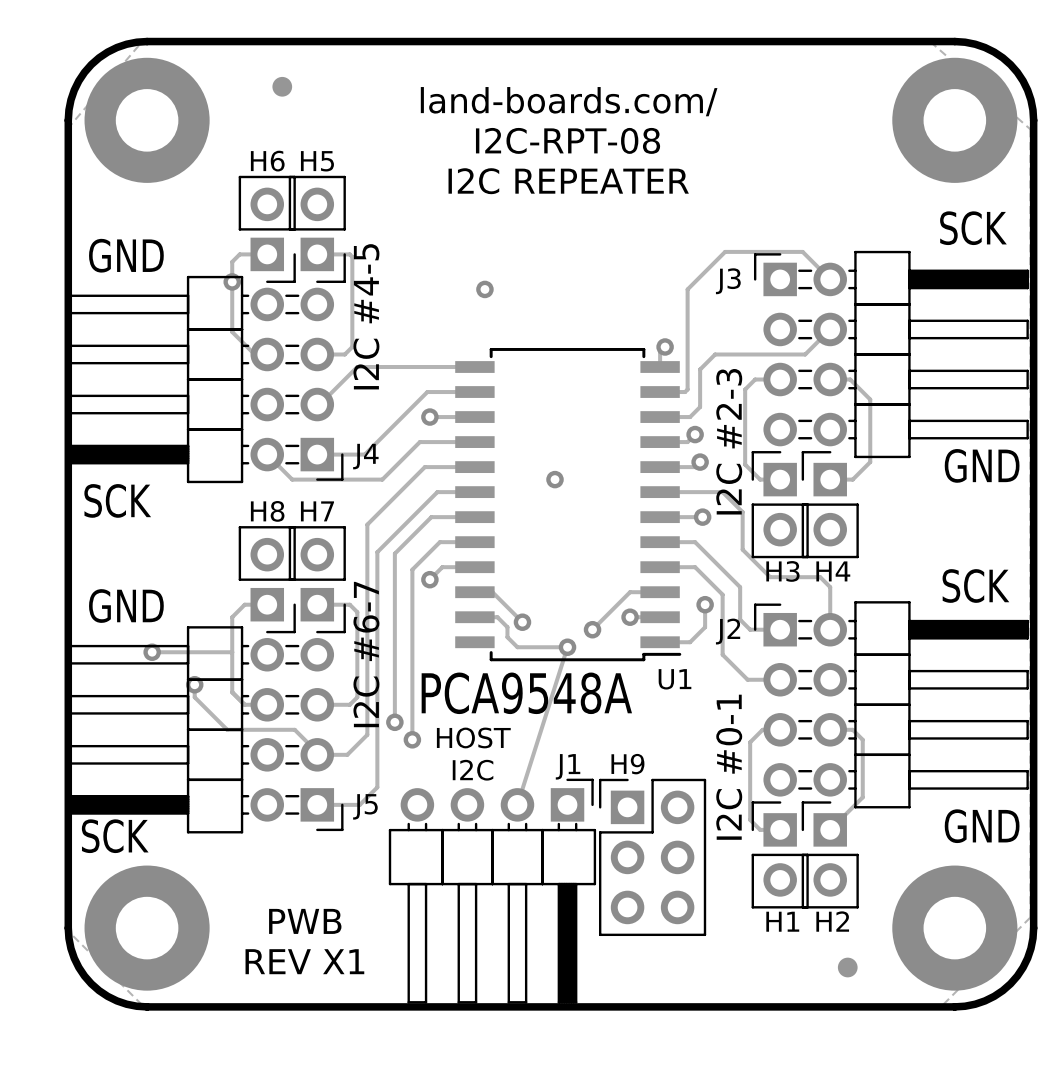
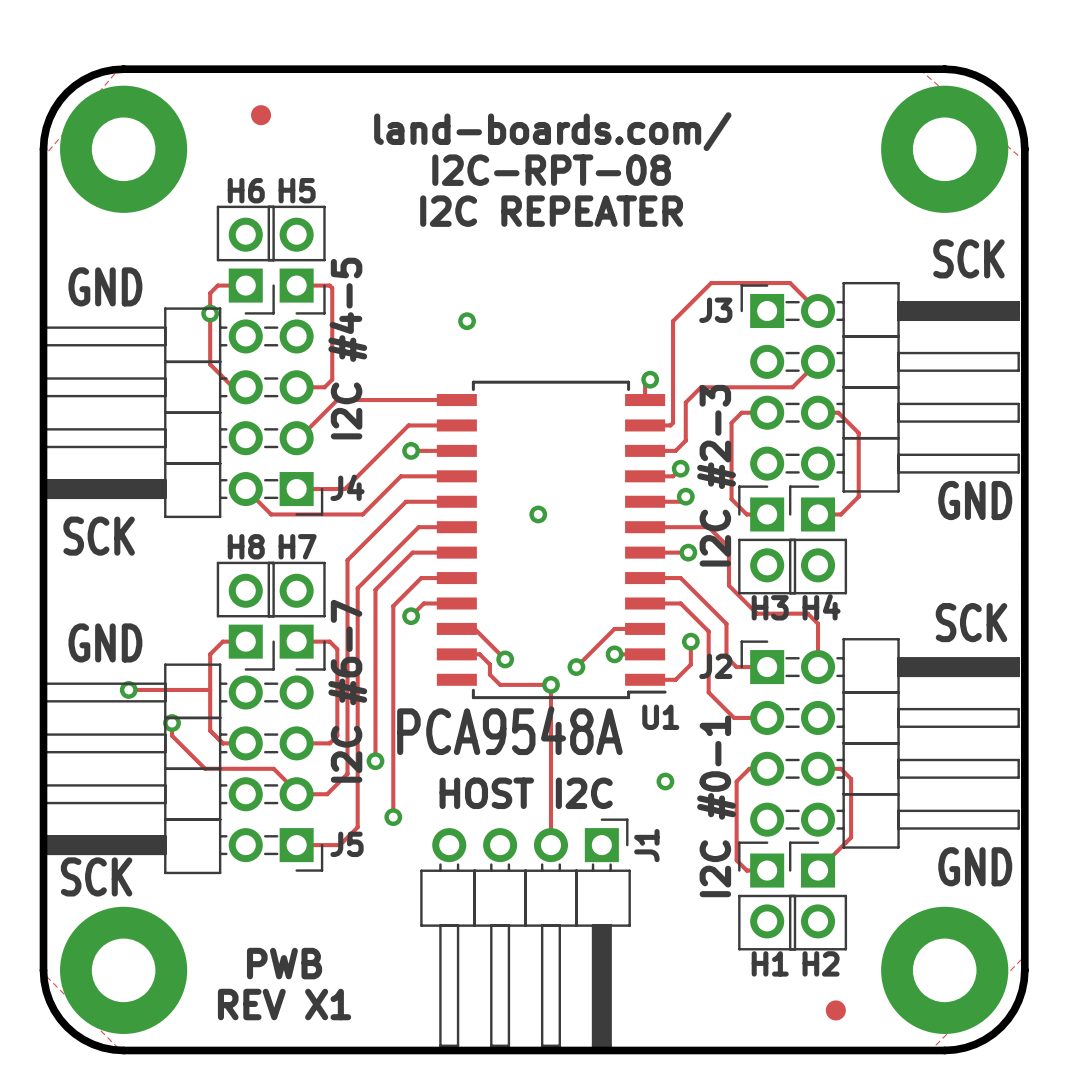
track: (567, 647) (517, 804) -> (550, 684) (550, 845)
text: HOST (473, 737) -> HOST I2C (526, 793)
track: none -> (393, 778) (393, 817)
via position: (412, 739) -> (393, 817)
via: none -> (665, 781)
J1 name rotation: 0° (568, 766) -> 90° counterclockwise (646, 845)
J1 name position: J1 (568, 766) -> J1 (646, 845)
text: I2C (473, 770) -> none
H9: (652, 857) -> none
J1 position: (492, 891) -> (525, 932)

